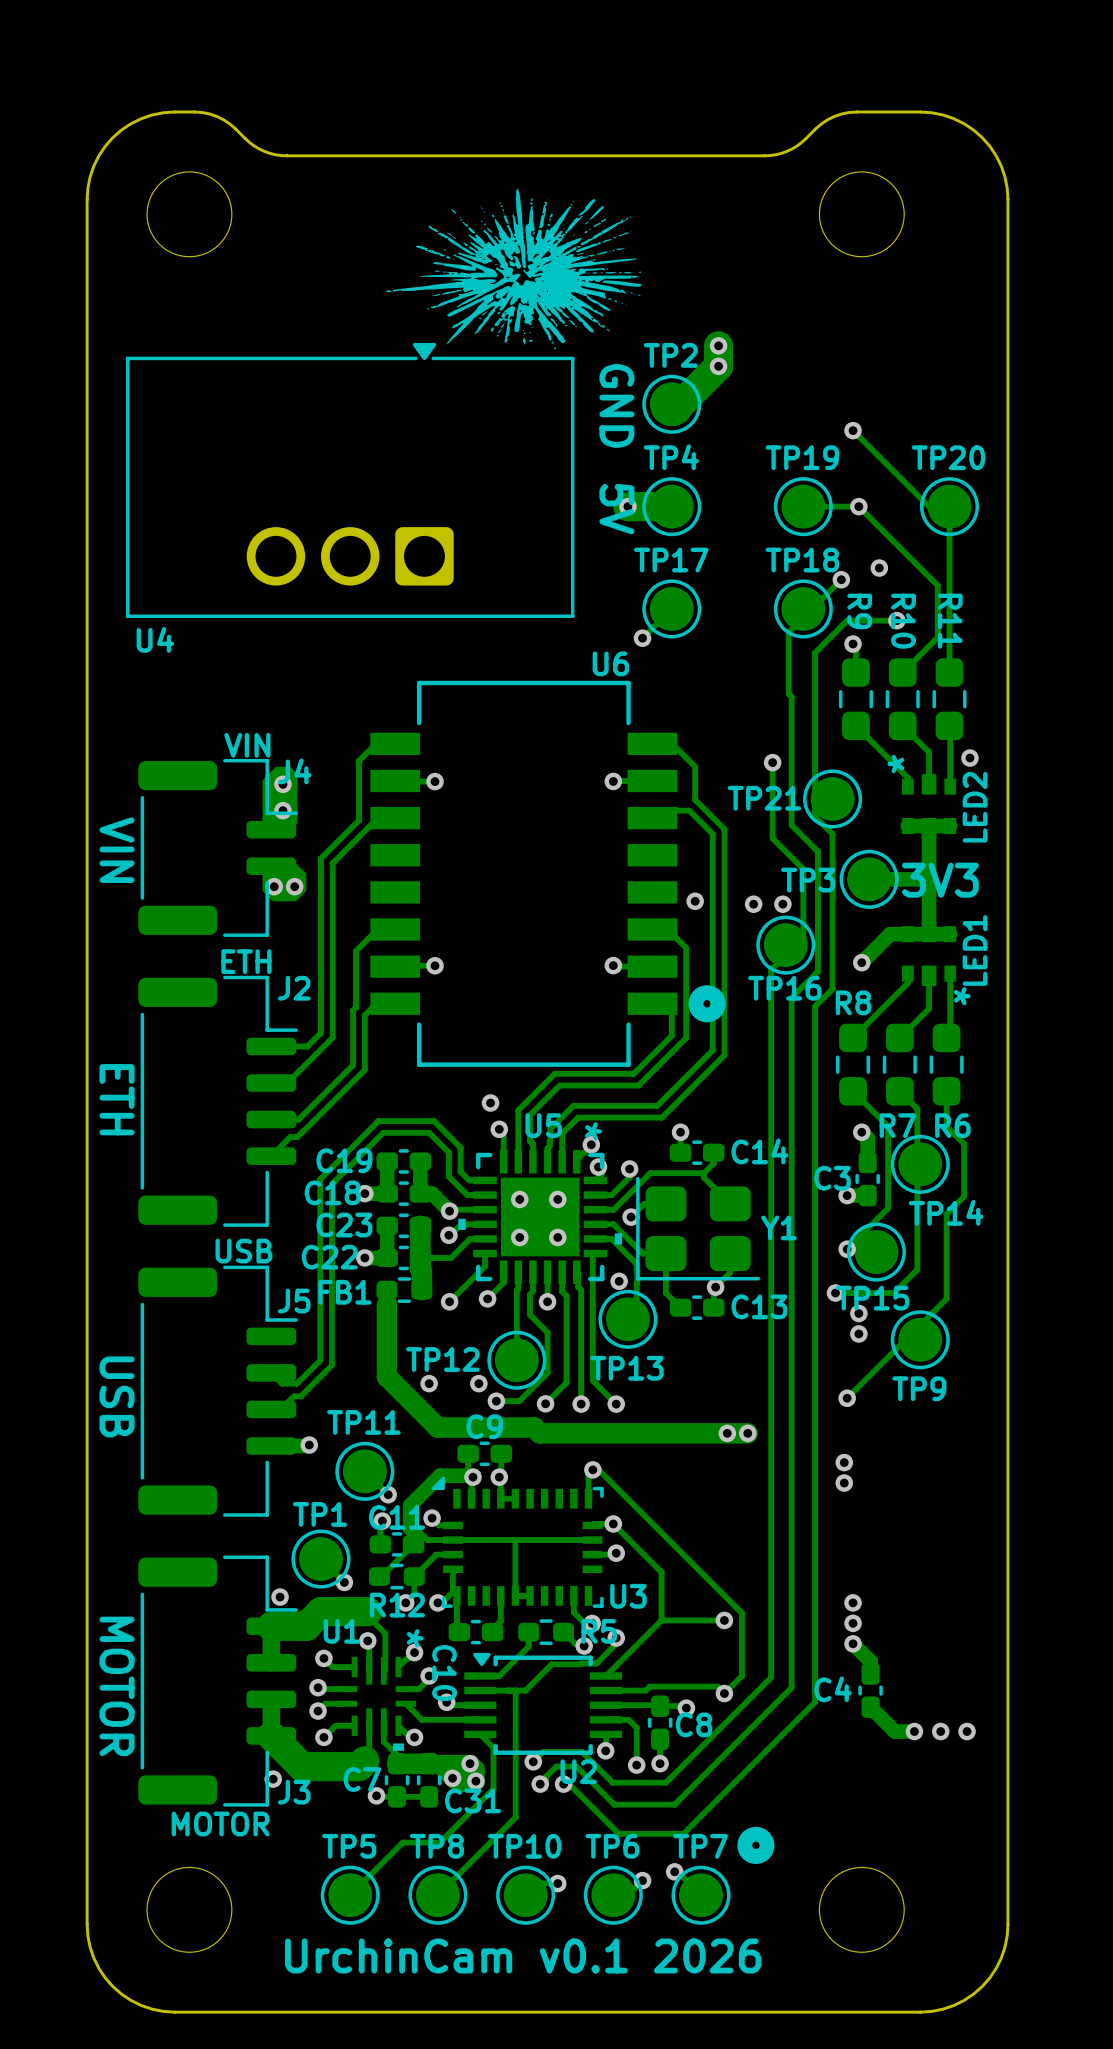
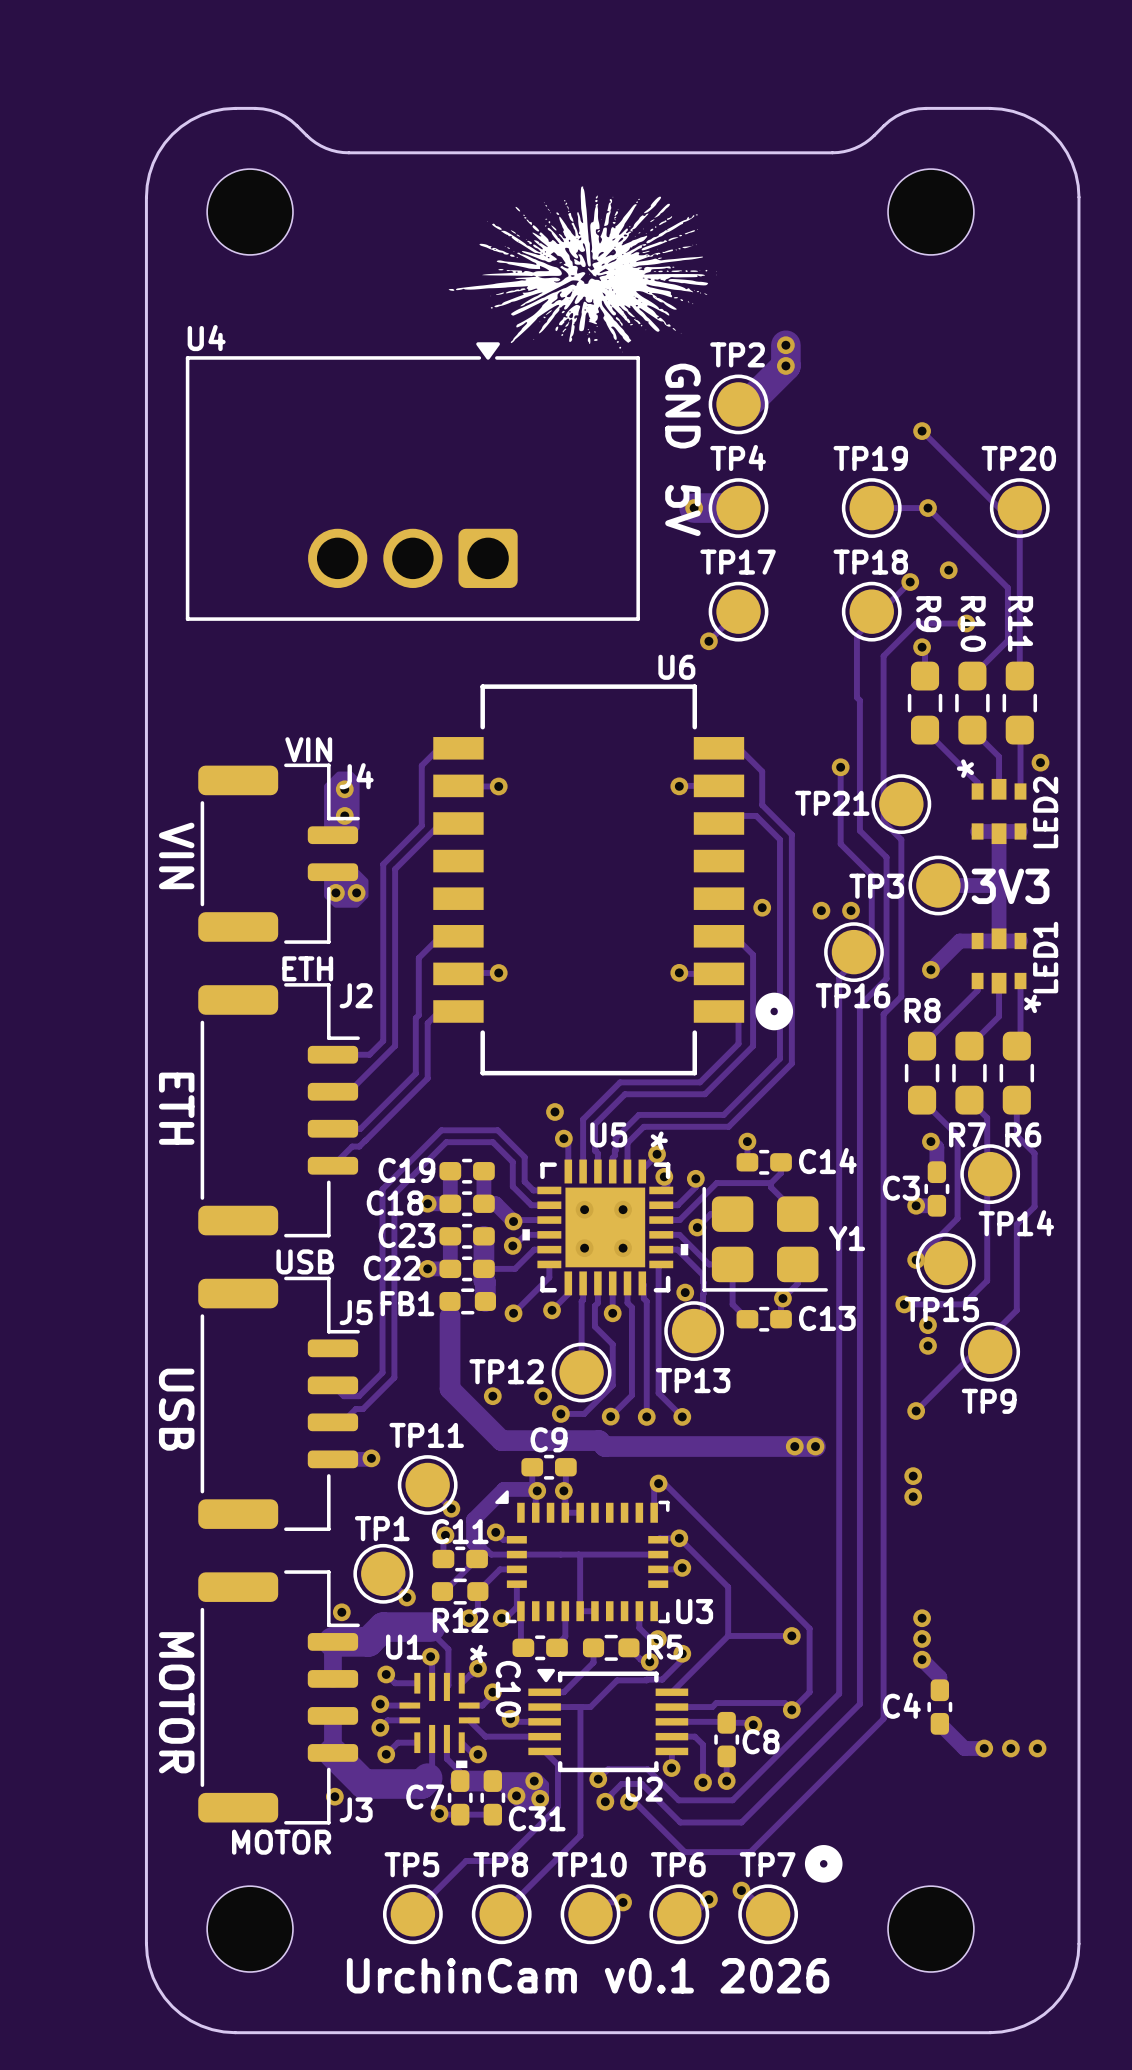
U4 name position: U4 (155, 639) -> U4 (206, 338)

